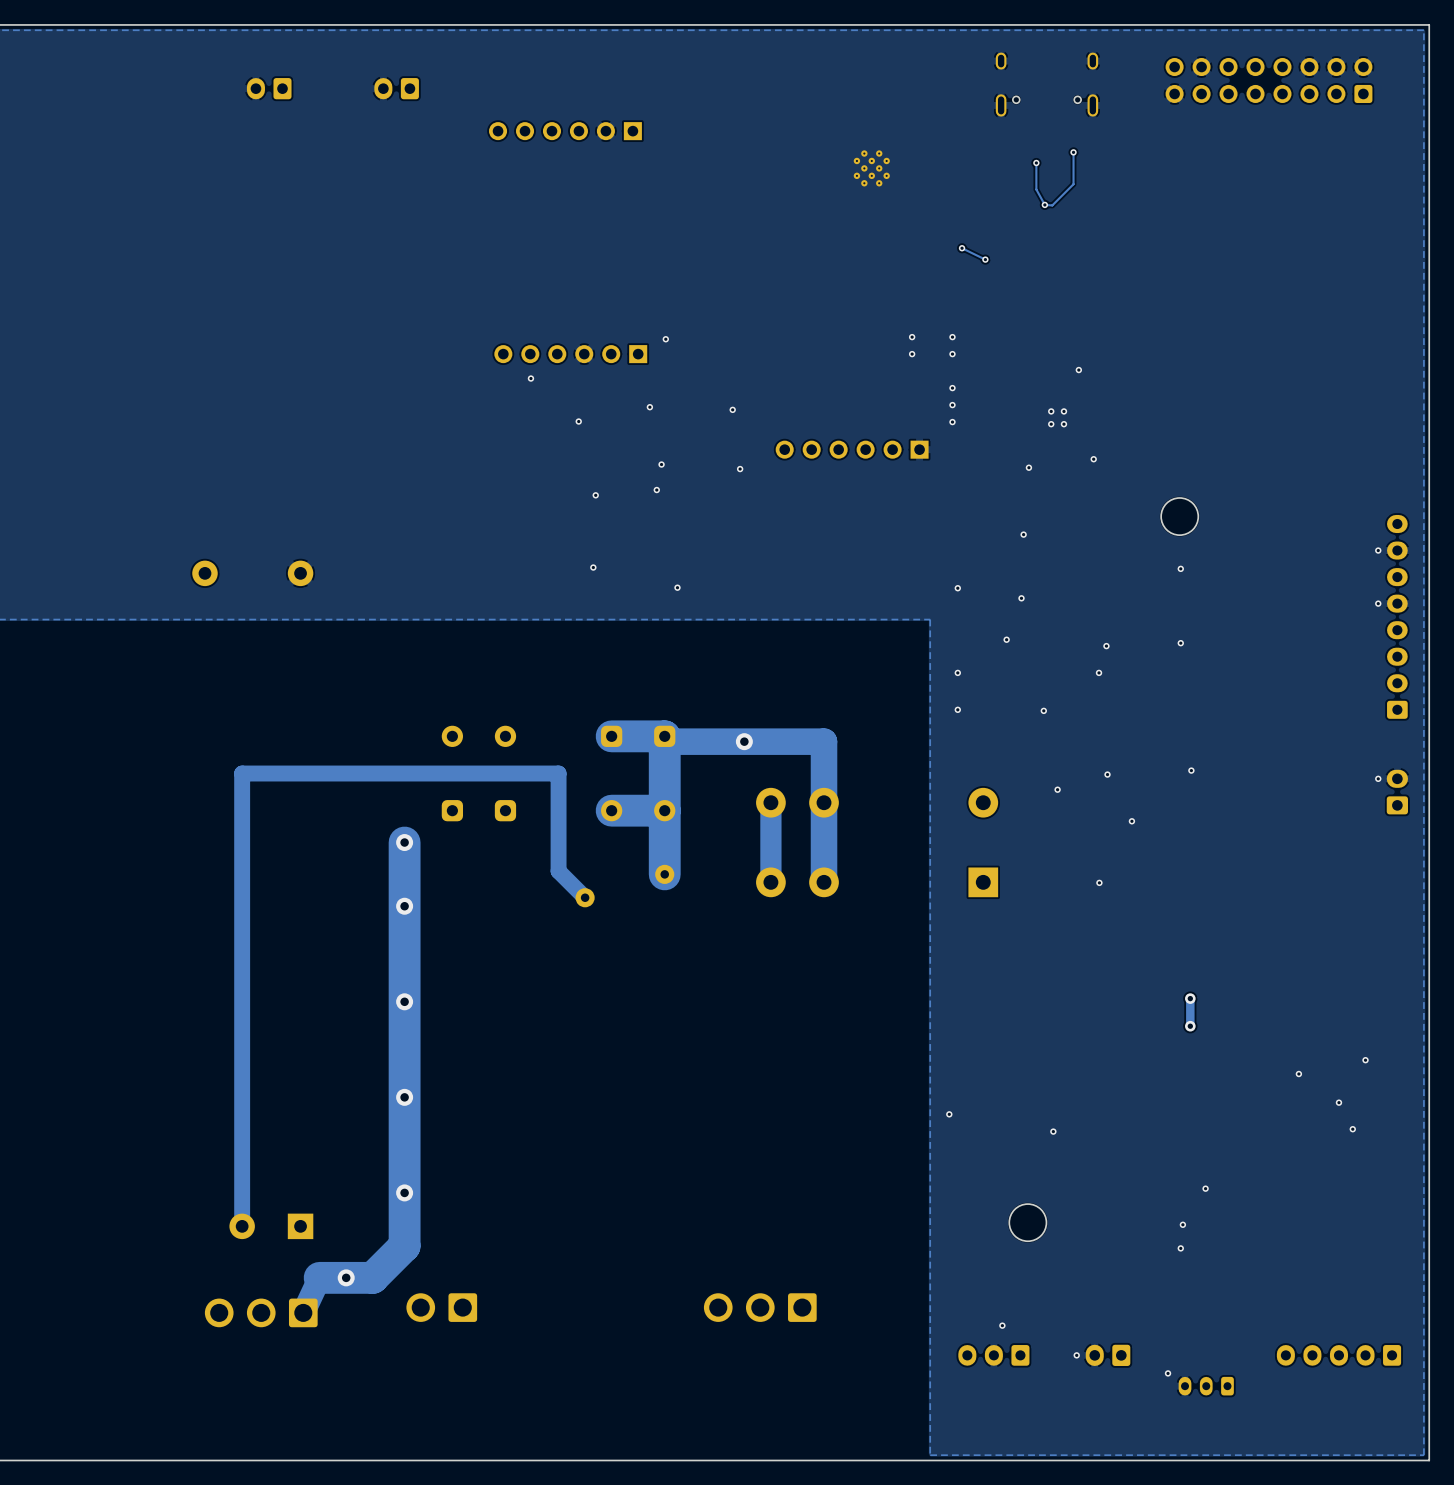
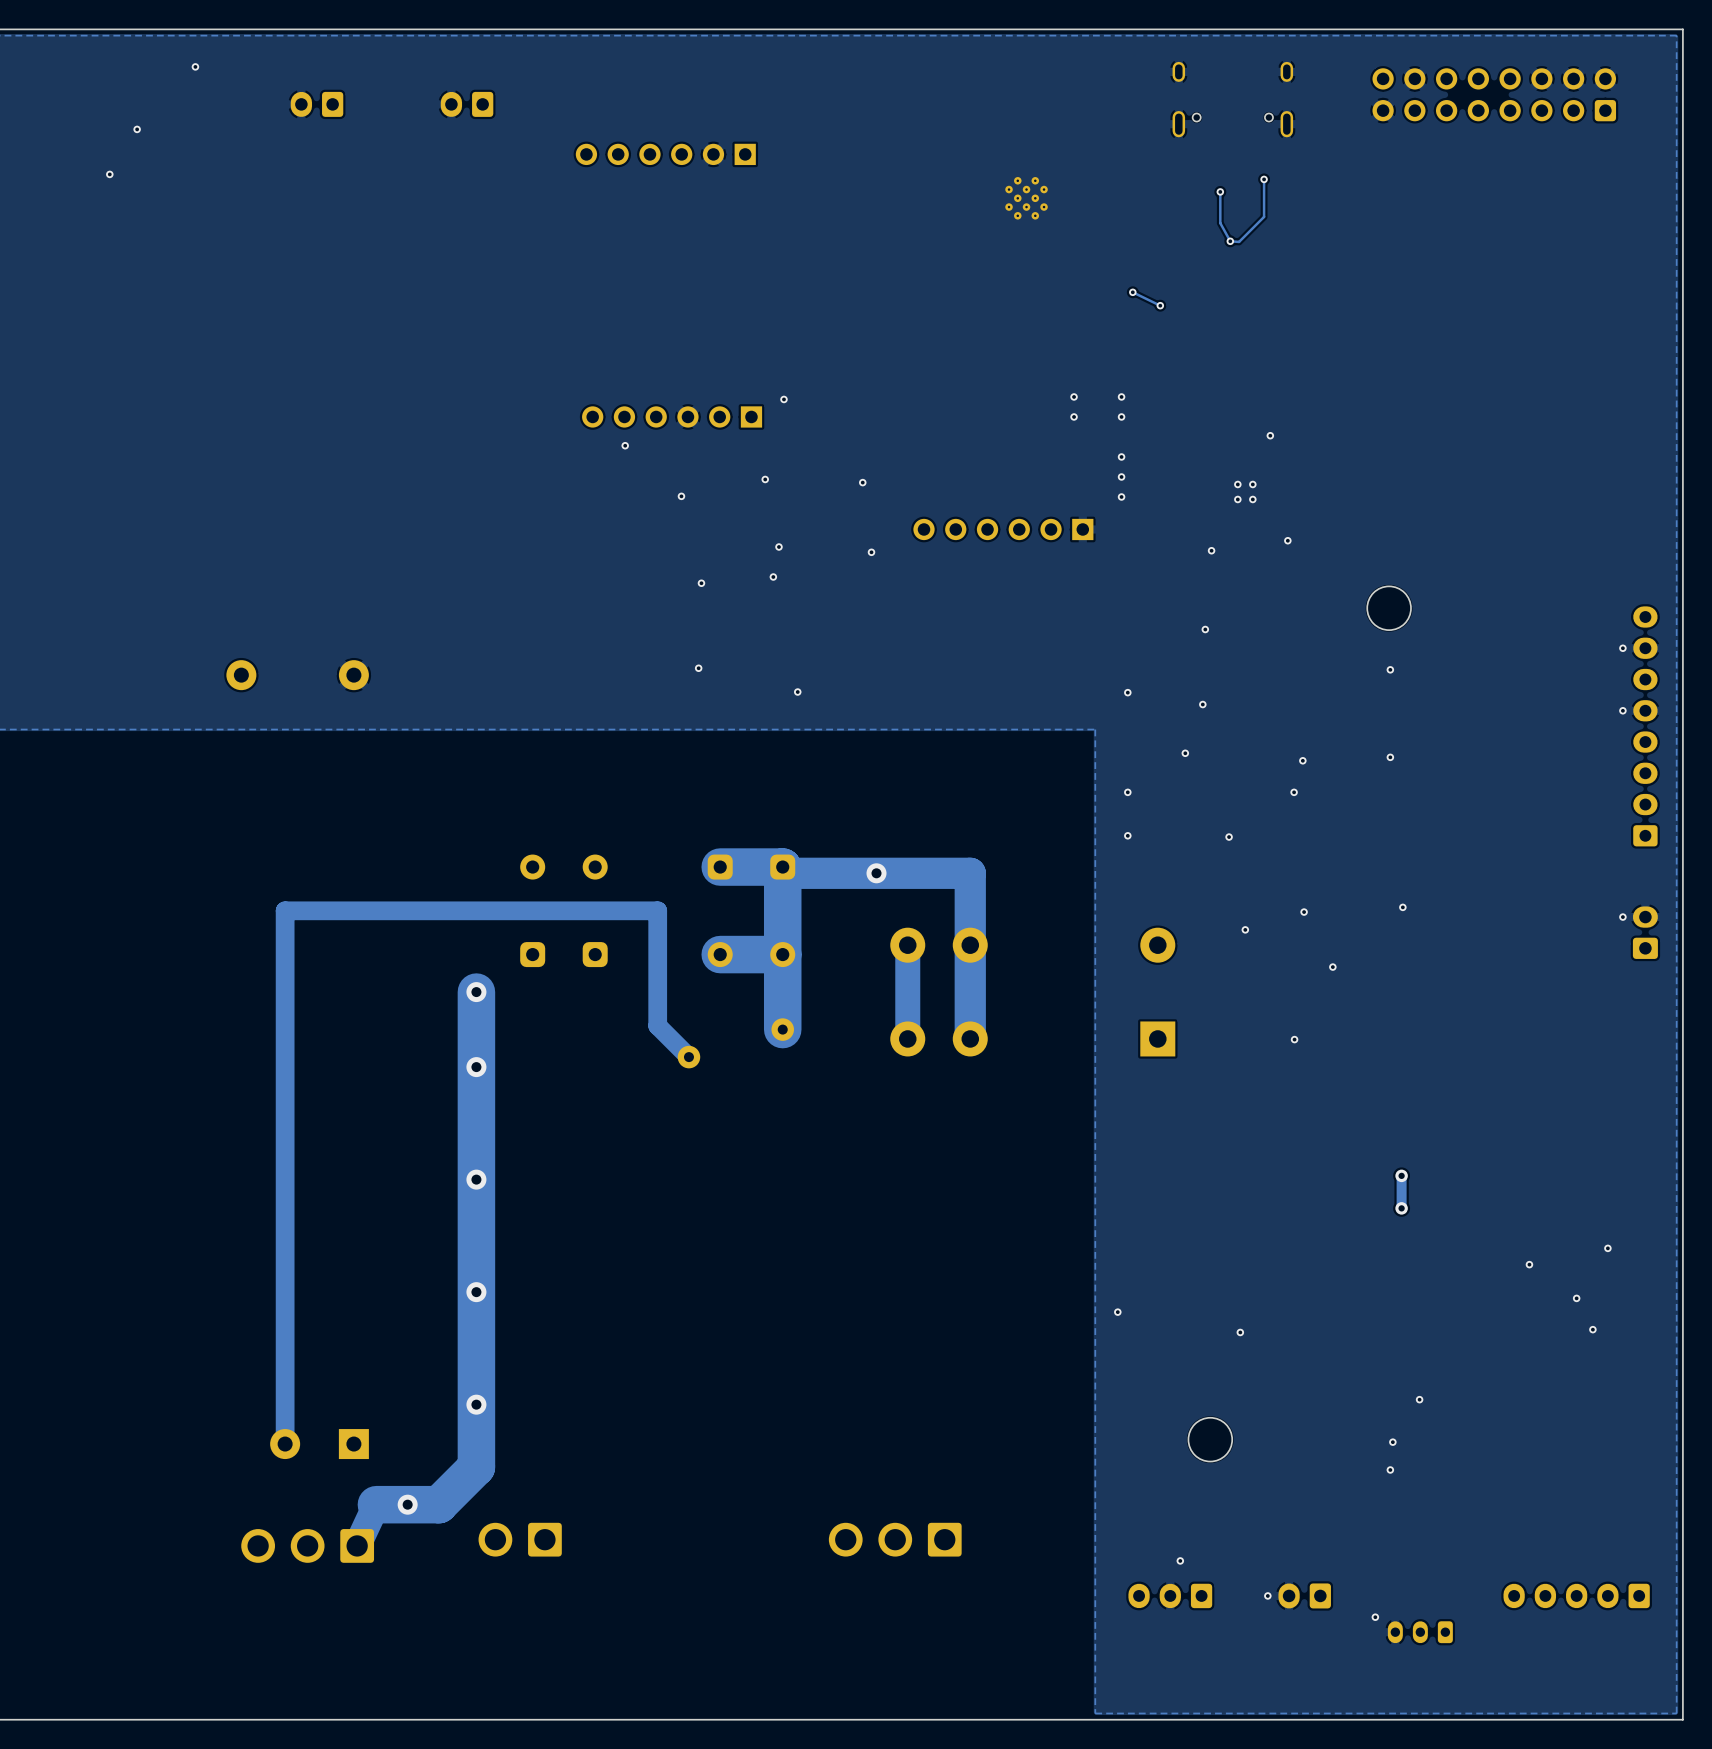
via: none -> (195, 66)
via: none -> (137, 129)
via: none -> (109, 174)

